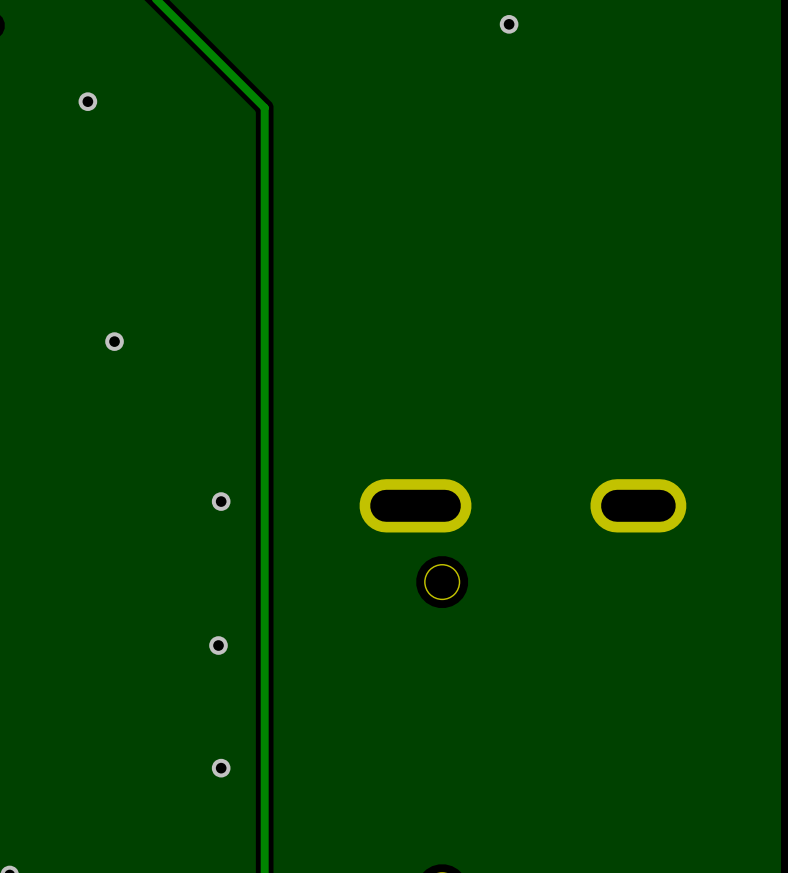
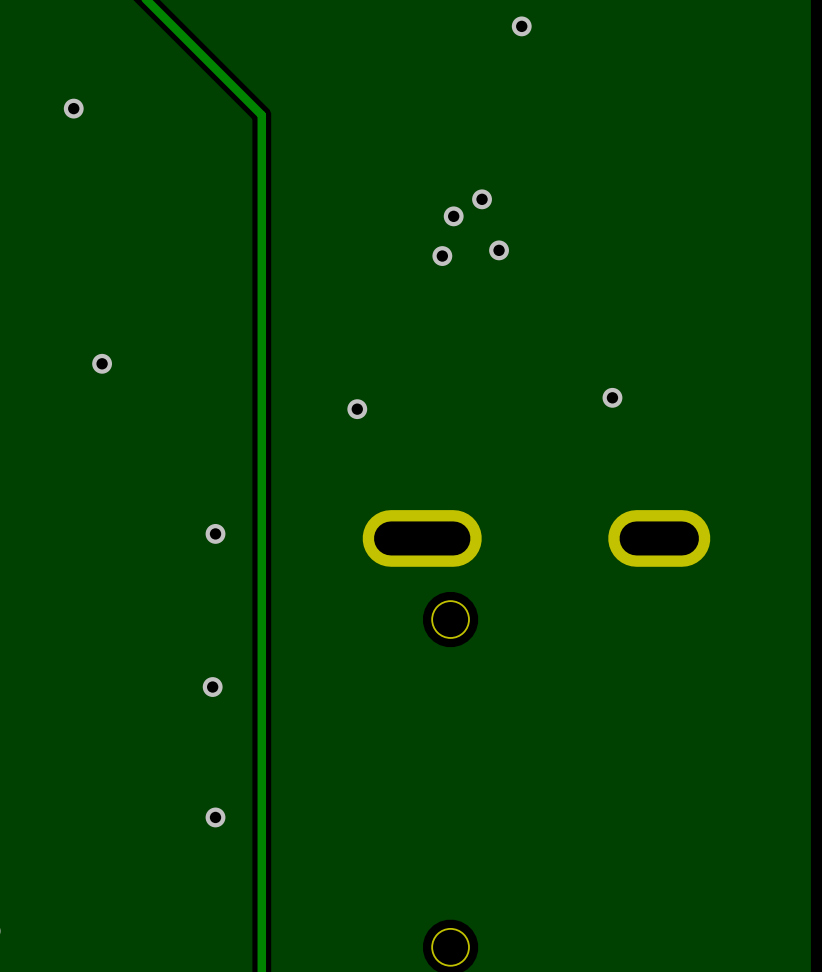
via: none -> (482, 199)
via: none -> (453, 216)
via: none -> (499, 250)
via: none -> (442, 256)
via: none -> (612, 397)
via: none -> (357, 409)

